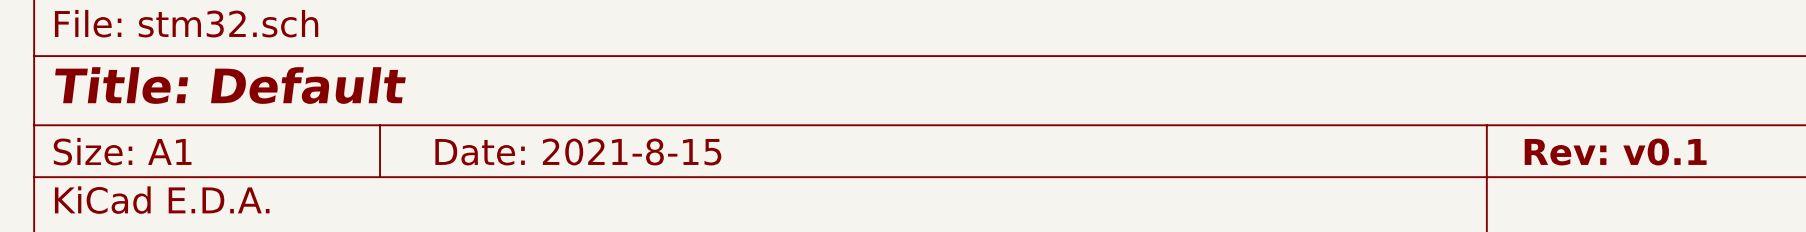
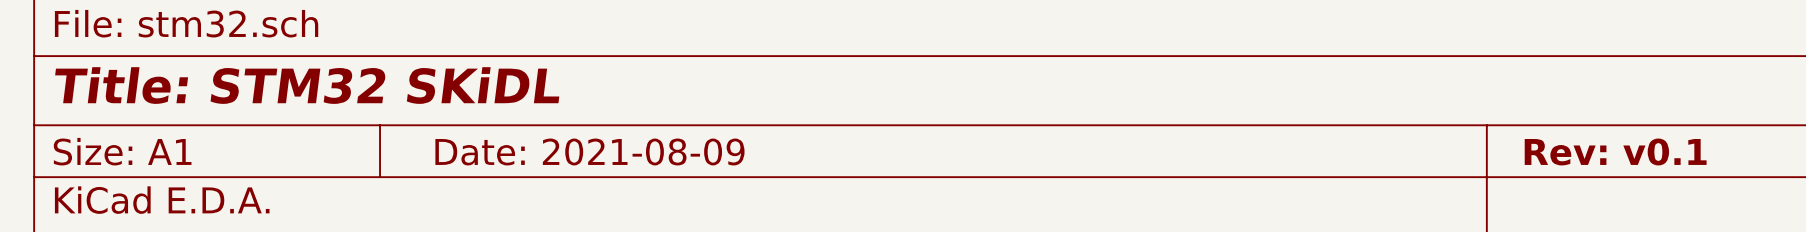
title block: Title: Default (230, 85) -> Title: STM32 SKiDL (307, 85)
title block: Date: 2021-8-15 (578, 151) -> Date: 2021-08-09 (589, 151)

